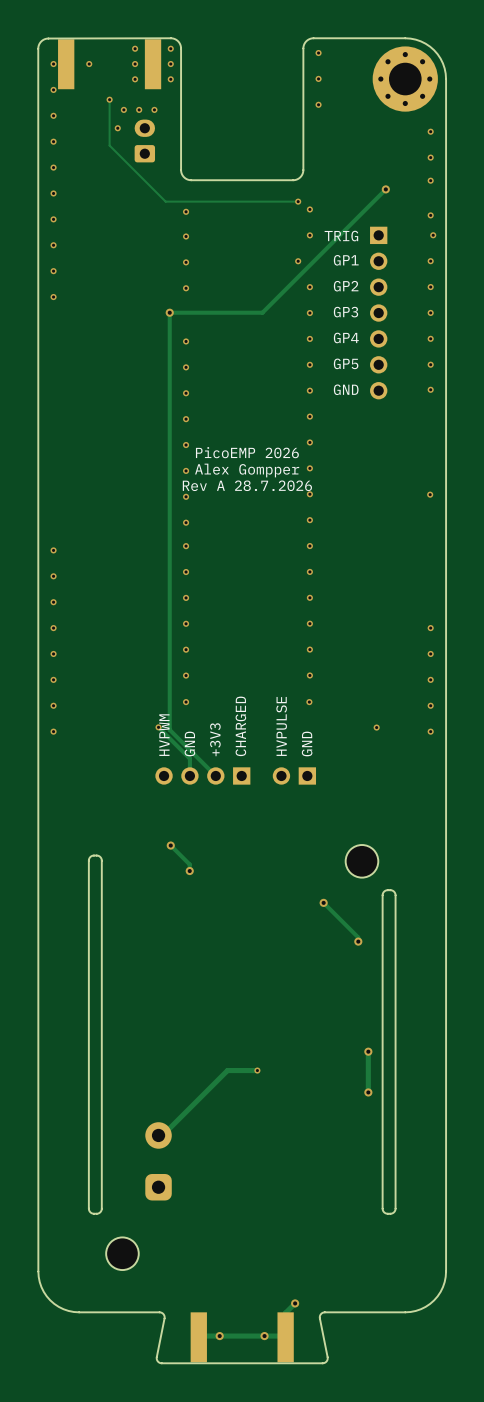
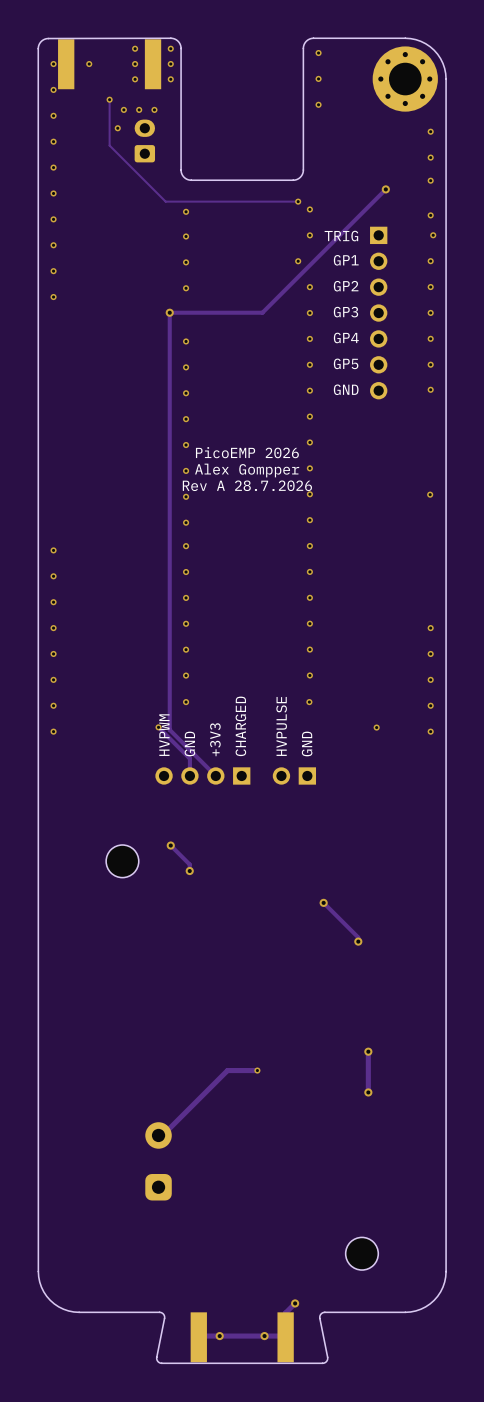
board edge: (96, 855) (91, 856) (88, 860) (88, 1208) (93, 1213) (99, 1213) (101, 1208) (101, 860) (96, 855) -> none
part: none -> (122, 861)
part: (361, 861) -> none
board edge: (390, 890) (385, 890) (382, 895) (382, 1208) (387, 1213) (393, 1212) (395, 1208) (395, 895) (390, 890) -> none
part: (122, 1253) -> none
part: none -> (361, 1253)

